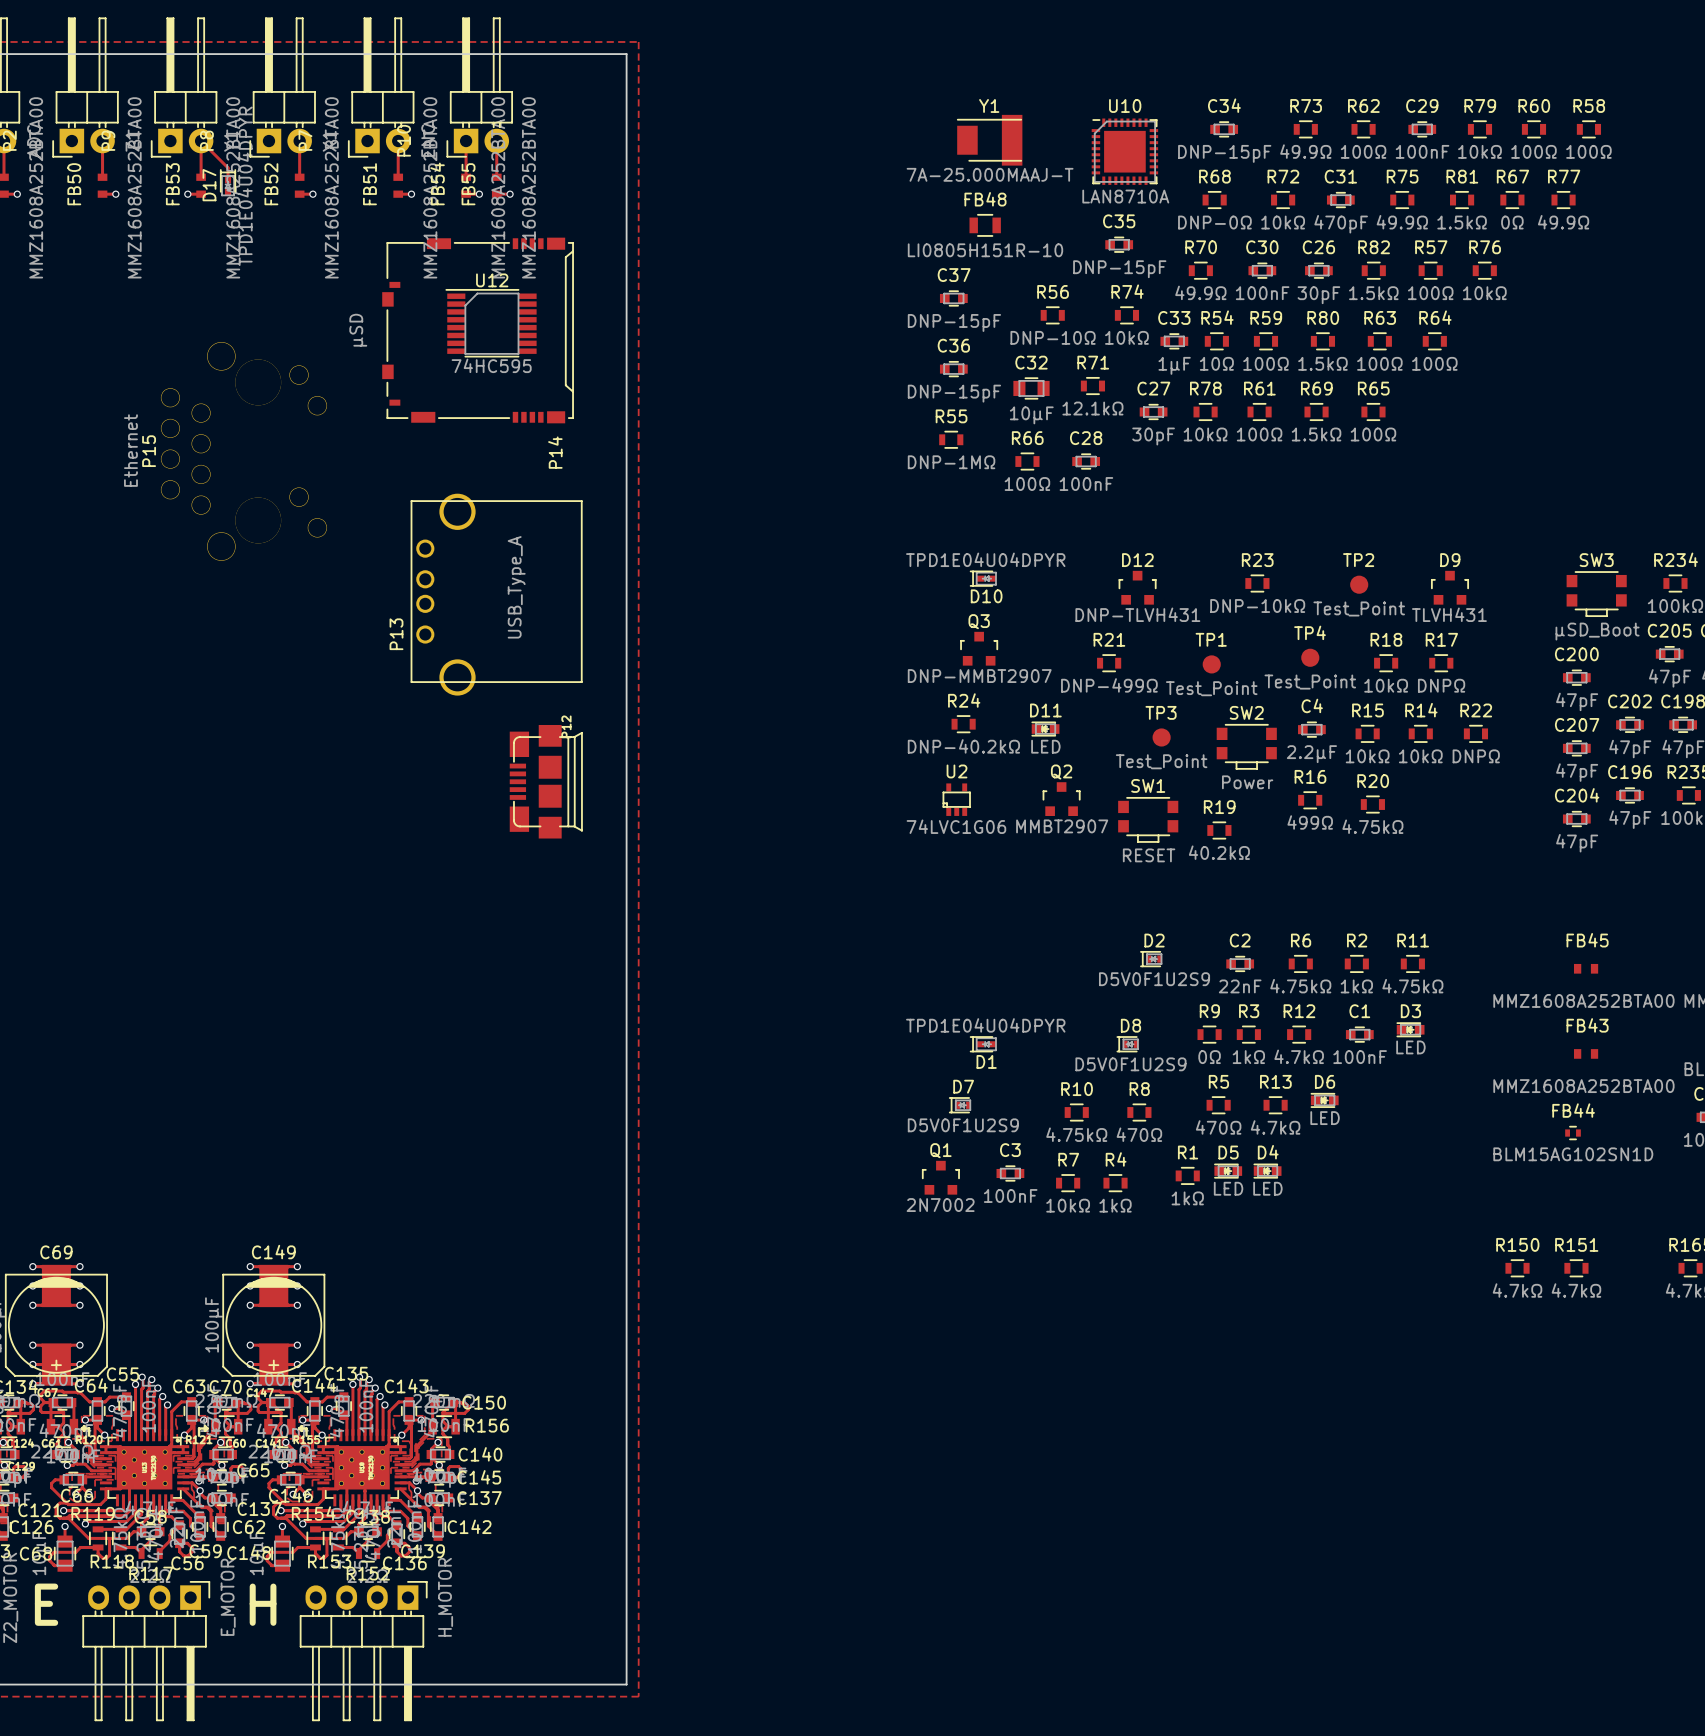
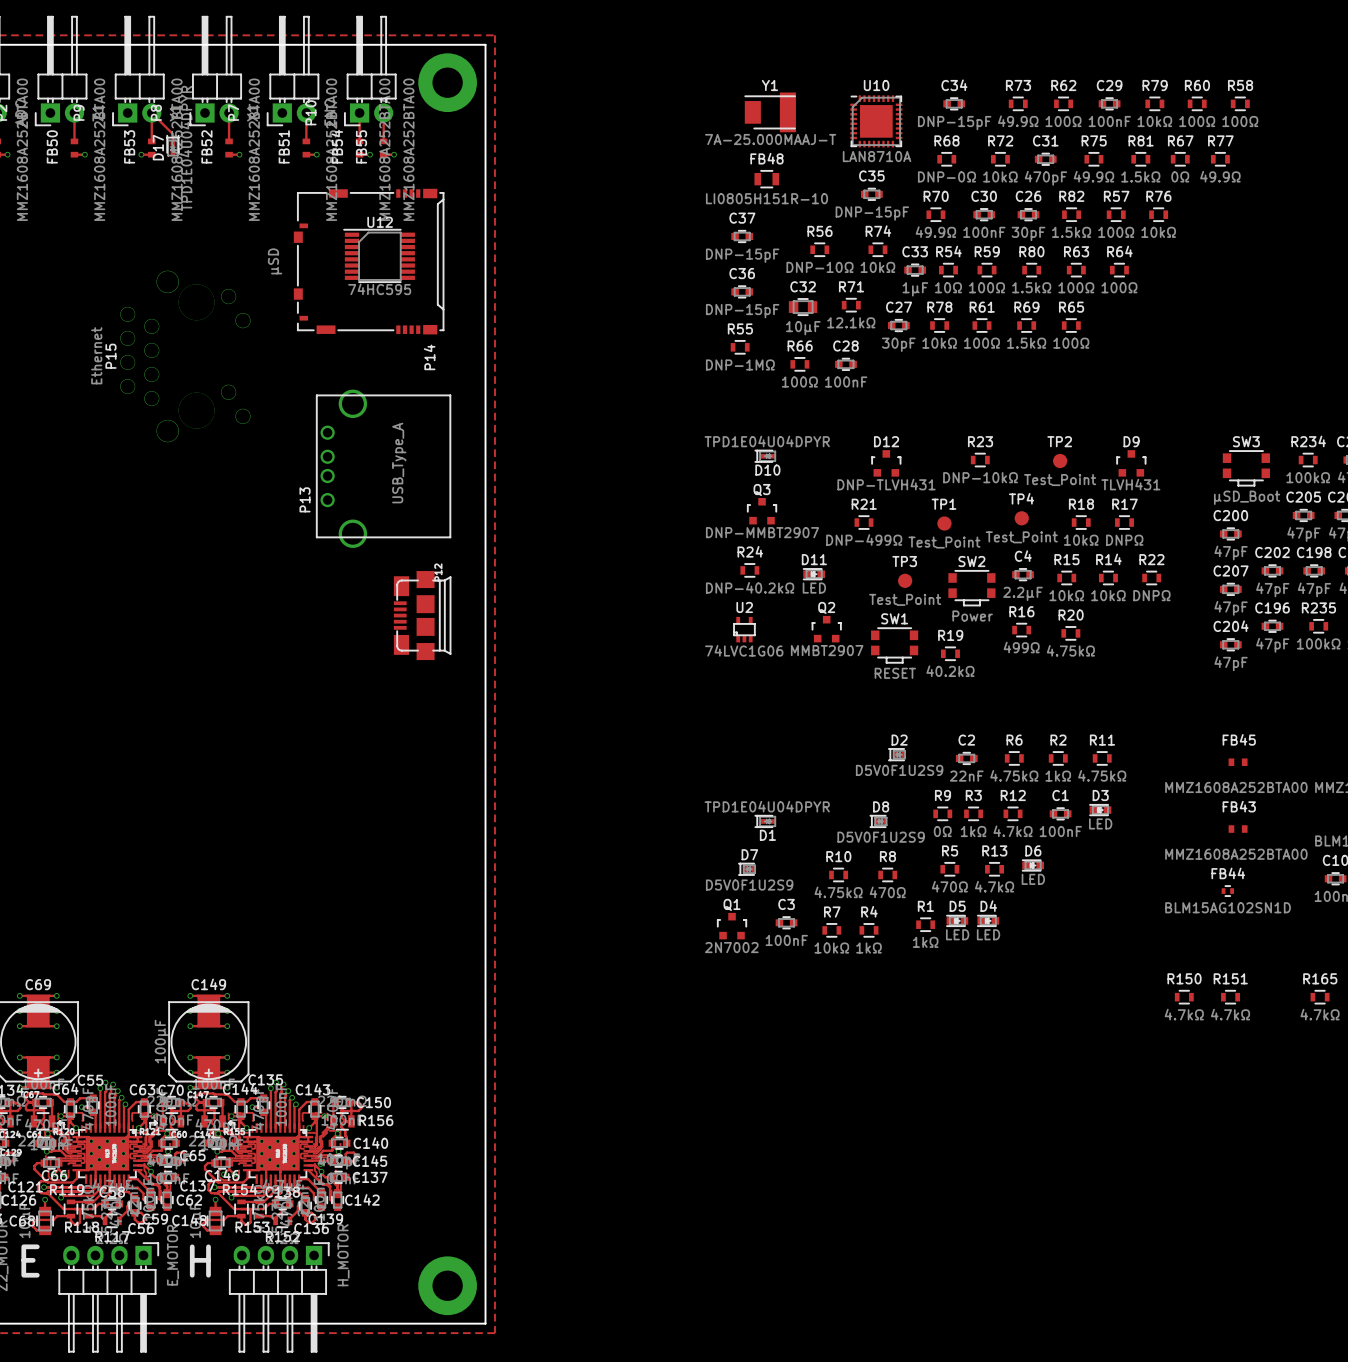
part: none -> (447, 82)
part: none -> (447, 1285)

